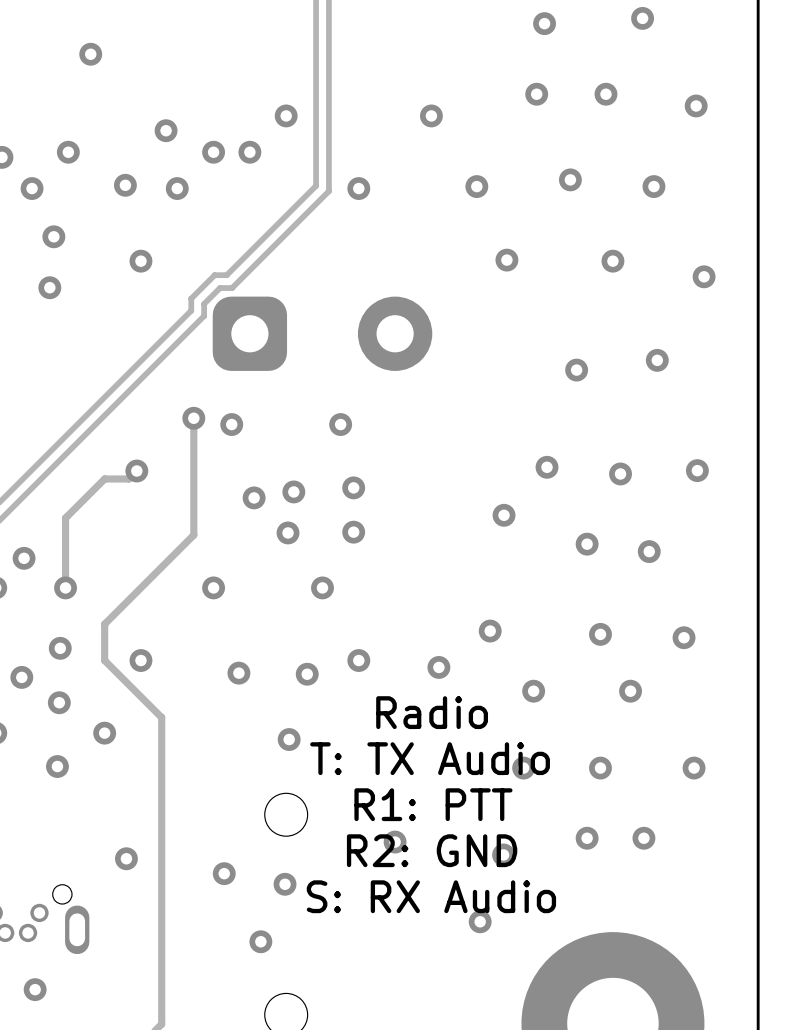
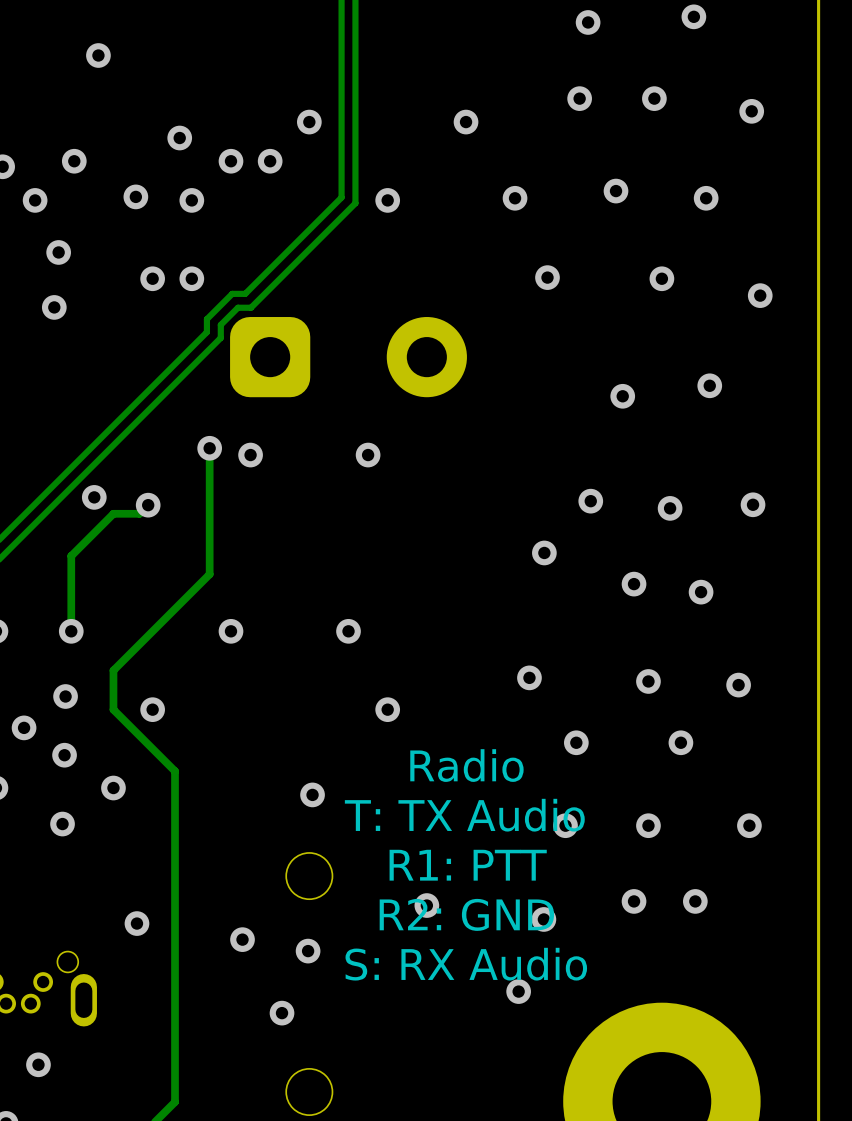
via: none -> (191, 278)
via: none -> (94, 497)
via: (353, 487) -> none
via: (293, 491) -> none
via: (254, 497) -> none
via: (288, 532) -> none
via: (353, 532) -> none
via: (24, 558) -> none
via: (438, 667) -> none
via: (238, 673) -> none
via: (307, 674) -> none

